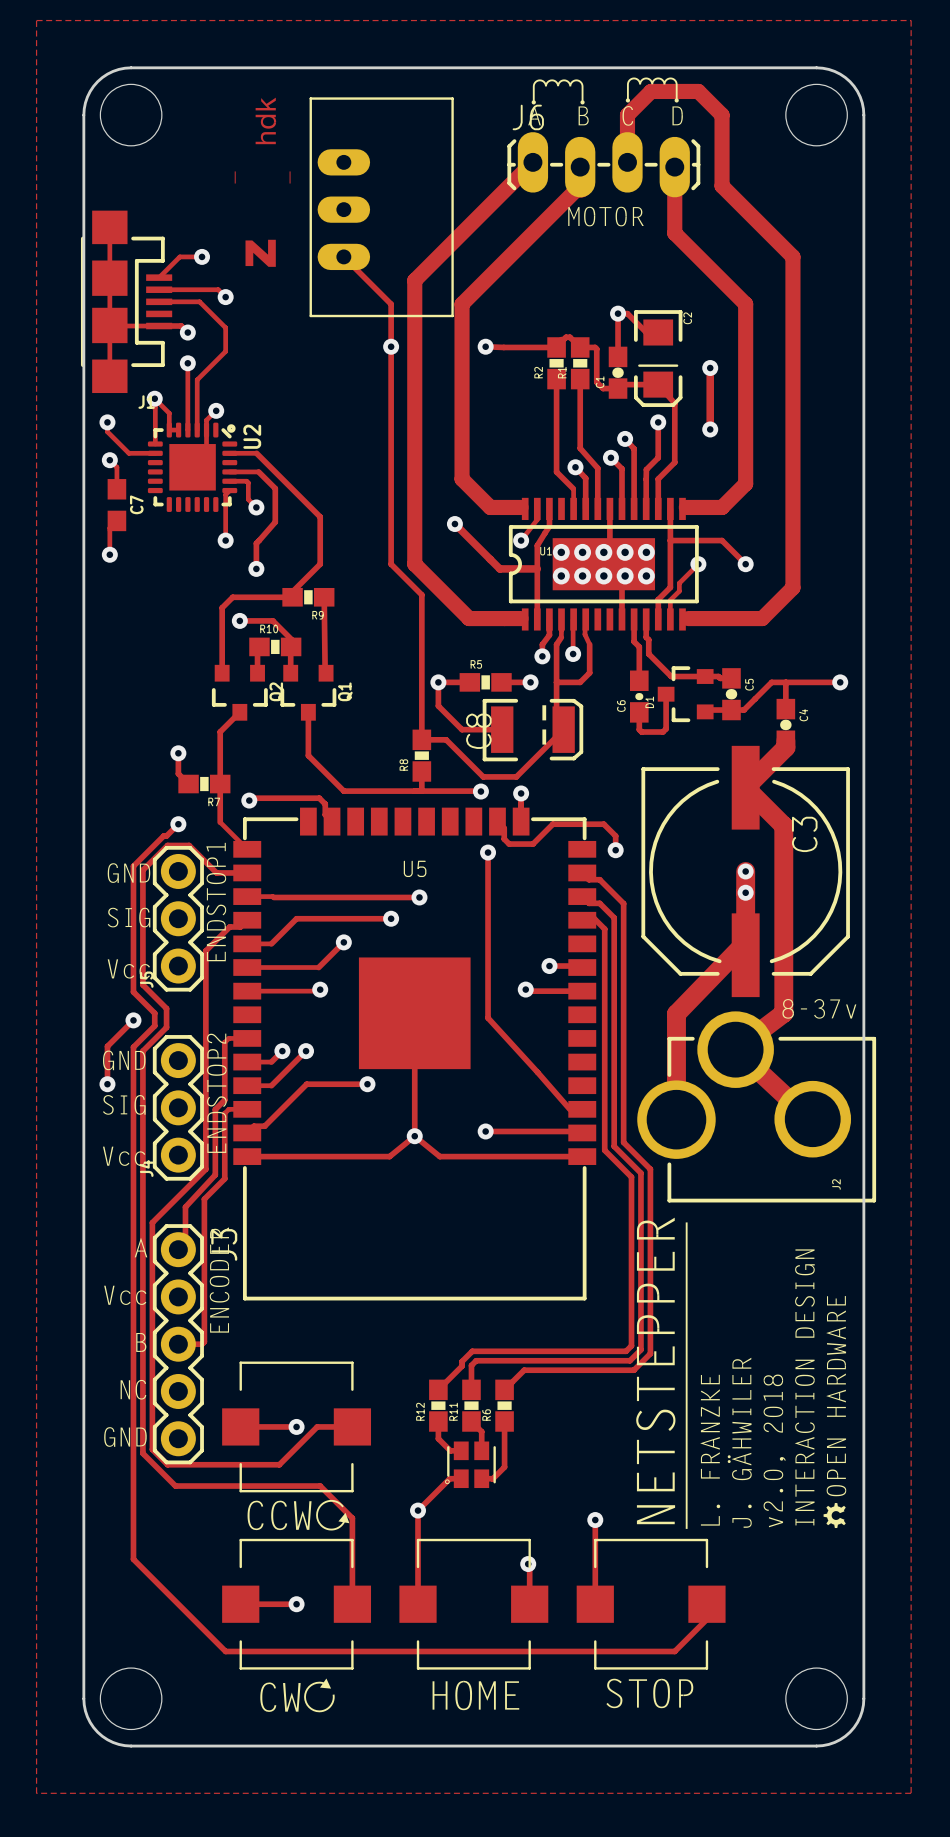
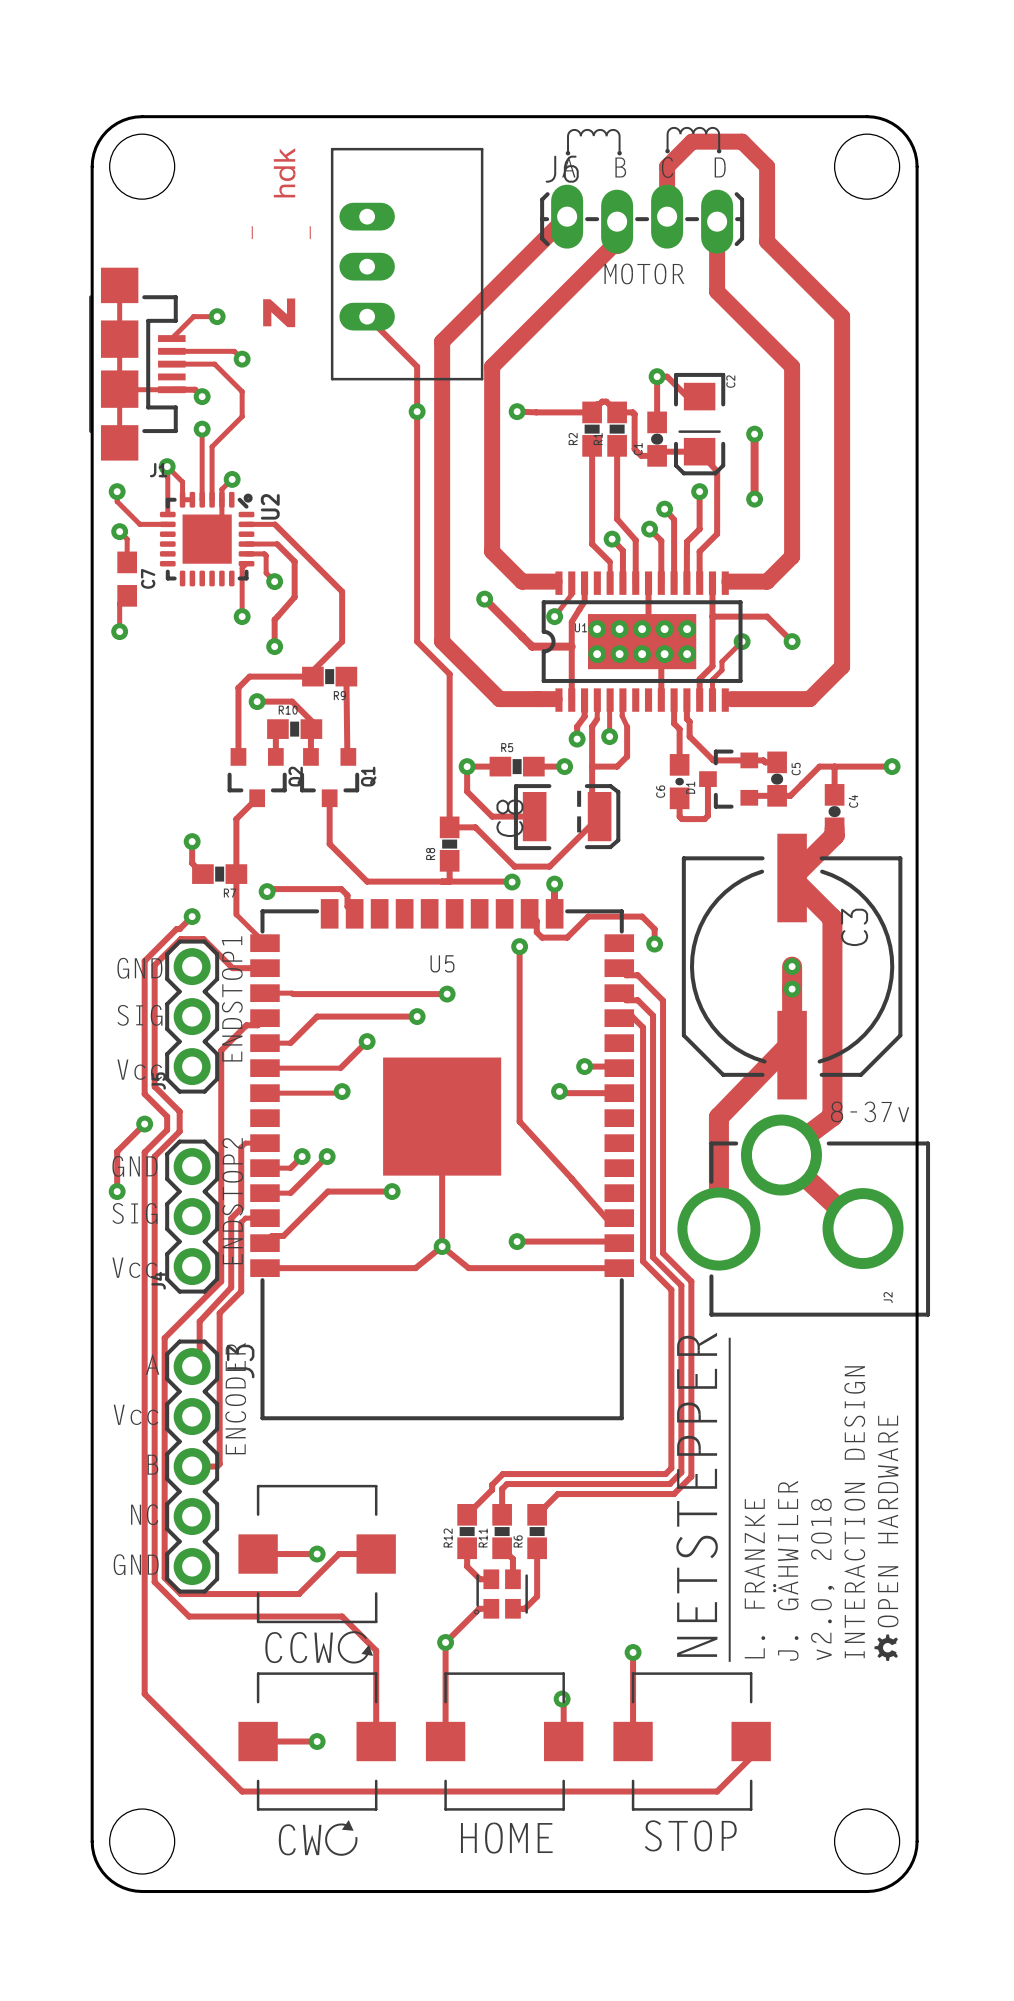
zone outline: (36, 20) (911, 20) (911, 1793) (36, 1793) (36, 20) -> none

